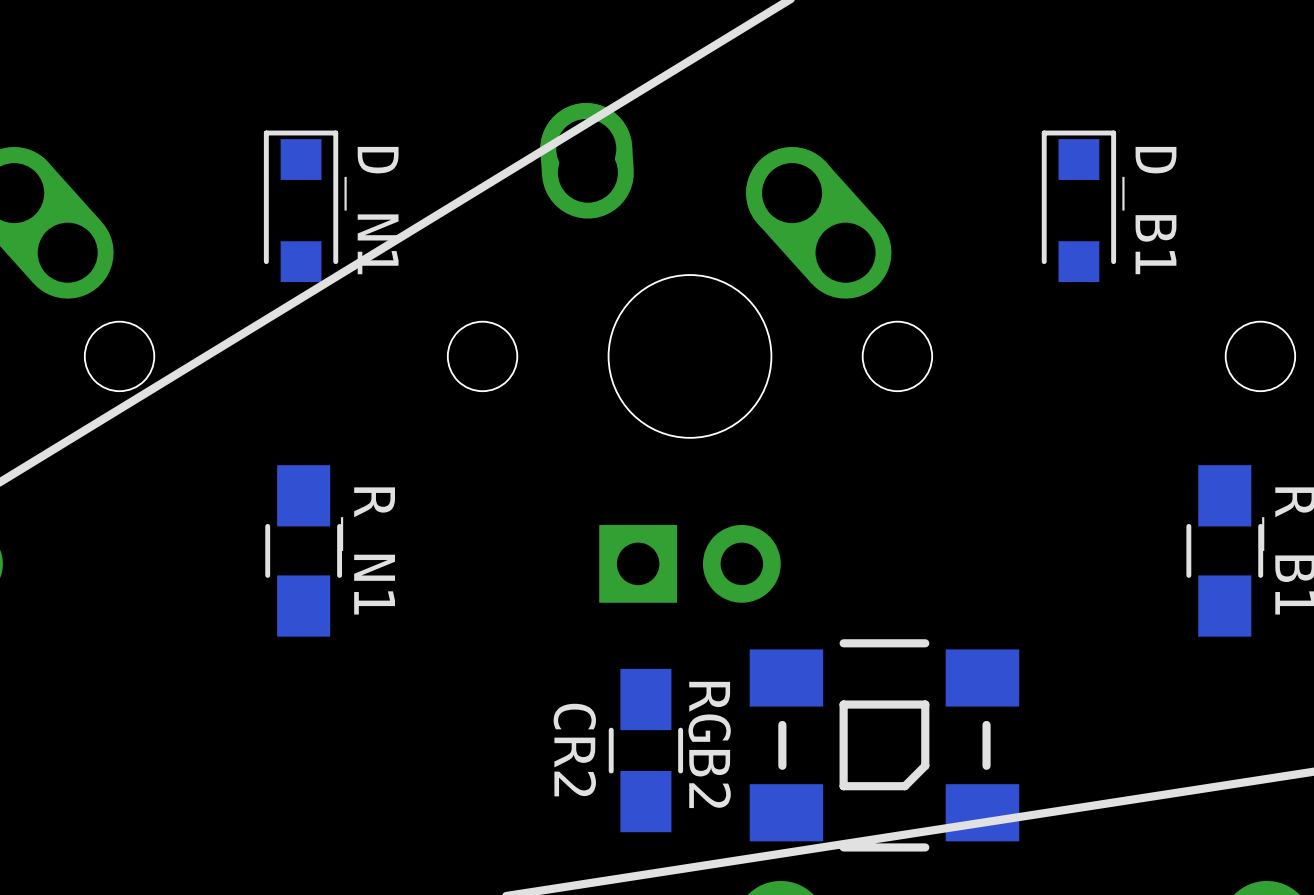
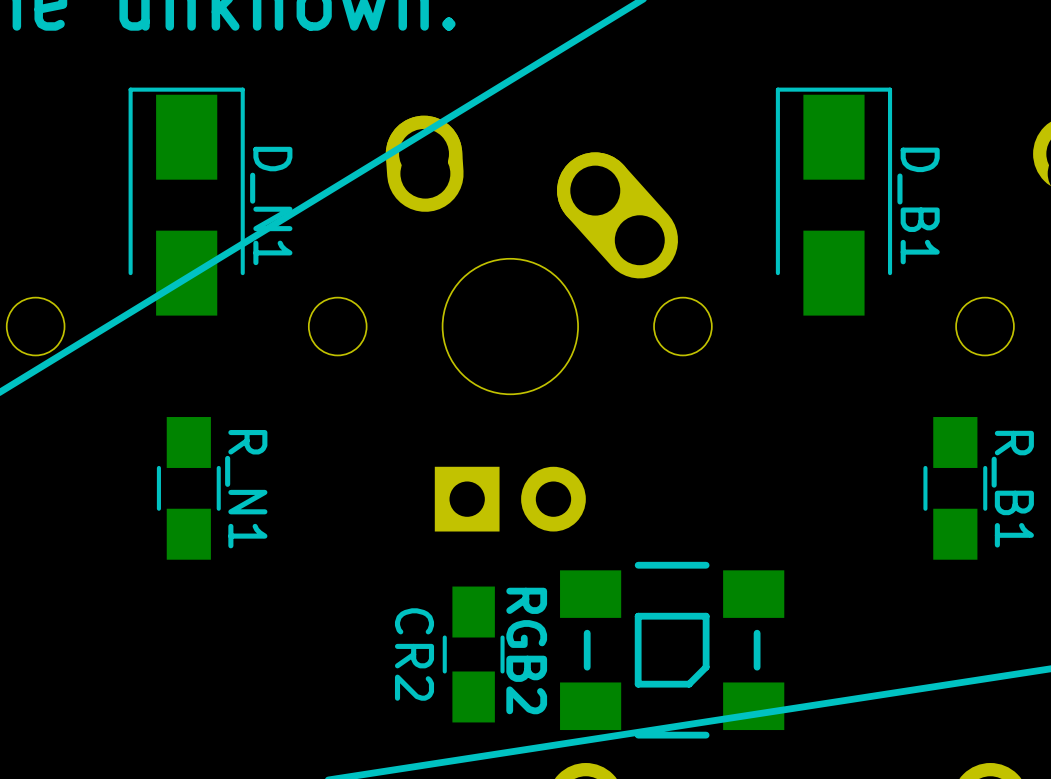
D_N1 footprint: [263, 130, 339, 283] -> [128, 87, 245, 316]
D_B1 footprint: [1041, 130, 1117, 283] -> [775, 87, 893, 316]

